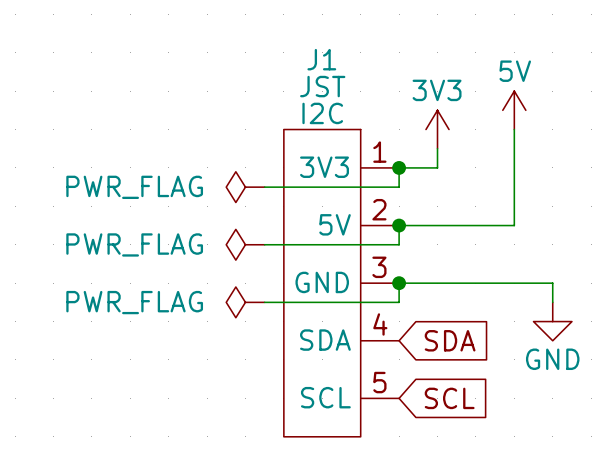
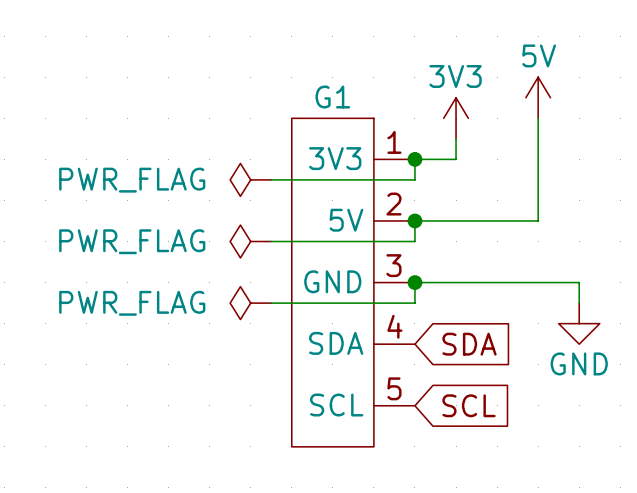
J1 name: J1 (321, 59) -> G1 (332, 97)
J1 value: JST (322, 86) -> none
J1 text: I2C (322, 113) -> none

